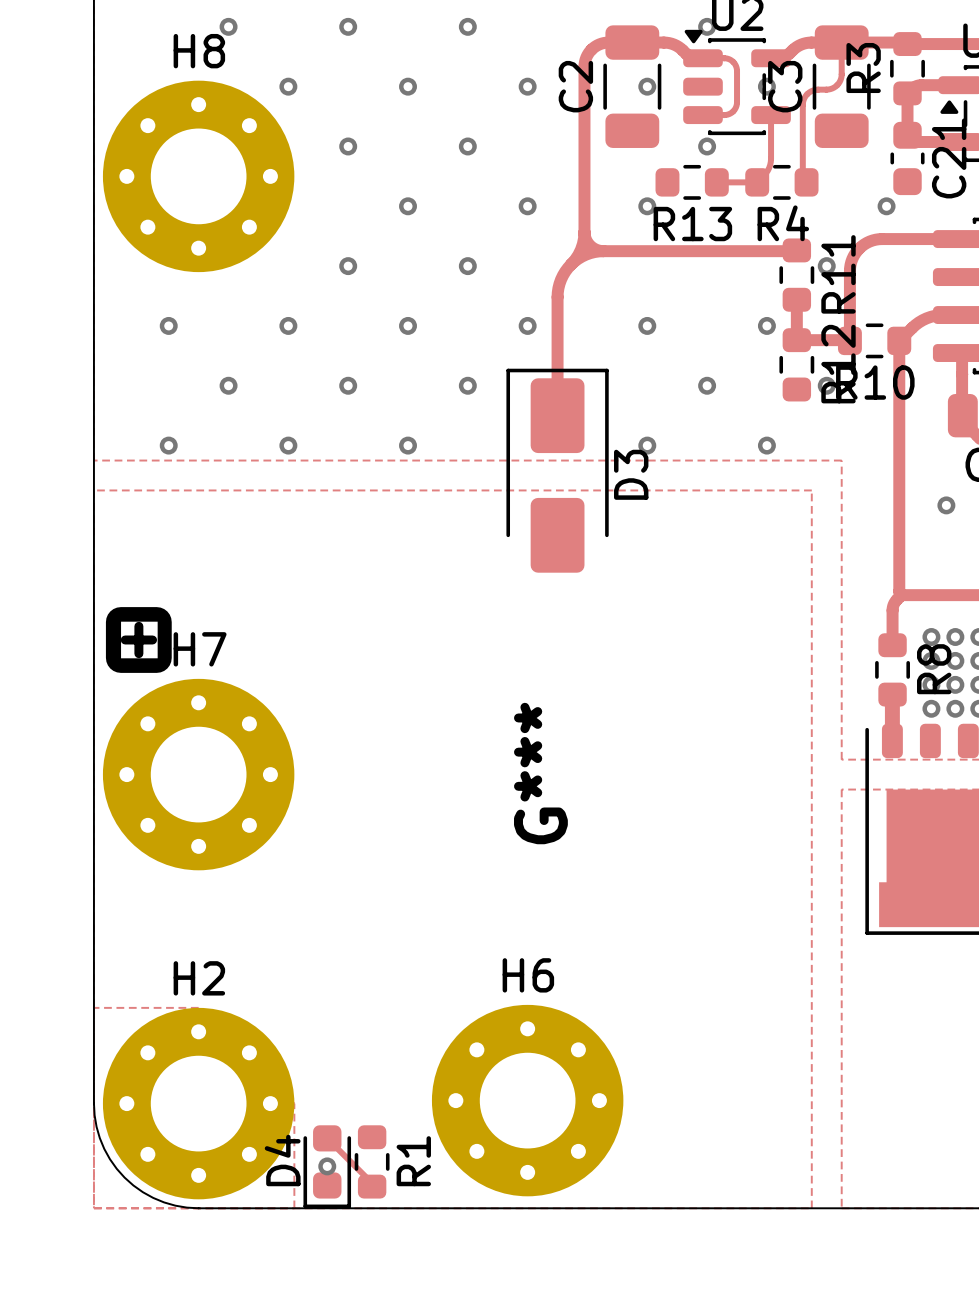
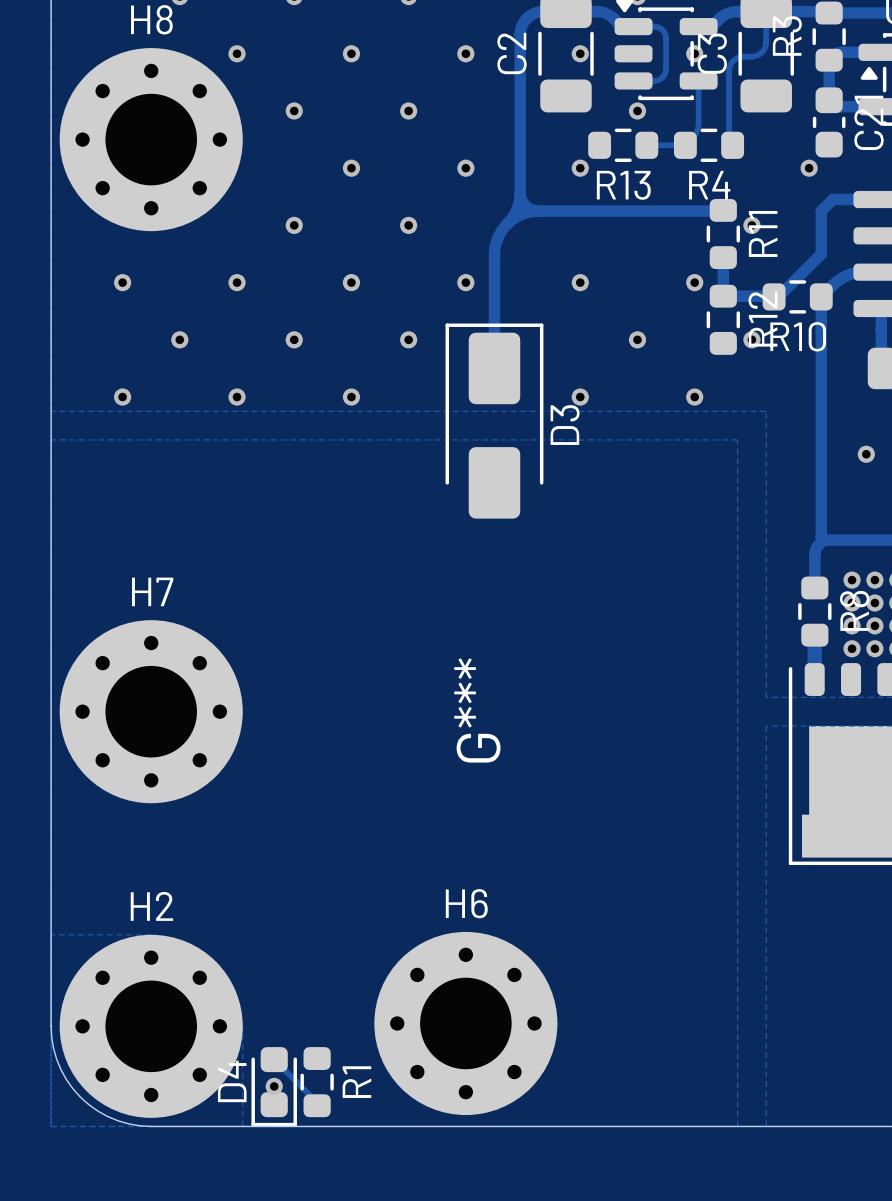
track: (911, 239) (872, 240) (864, 244) (855, 253) (850, 268) (848, 340) -> (832, 199) (821, 211) (821, 254) (778, 296)
drawing: [105, 607, 172, 673] -> none
text: + (138, 639) -> none

